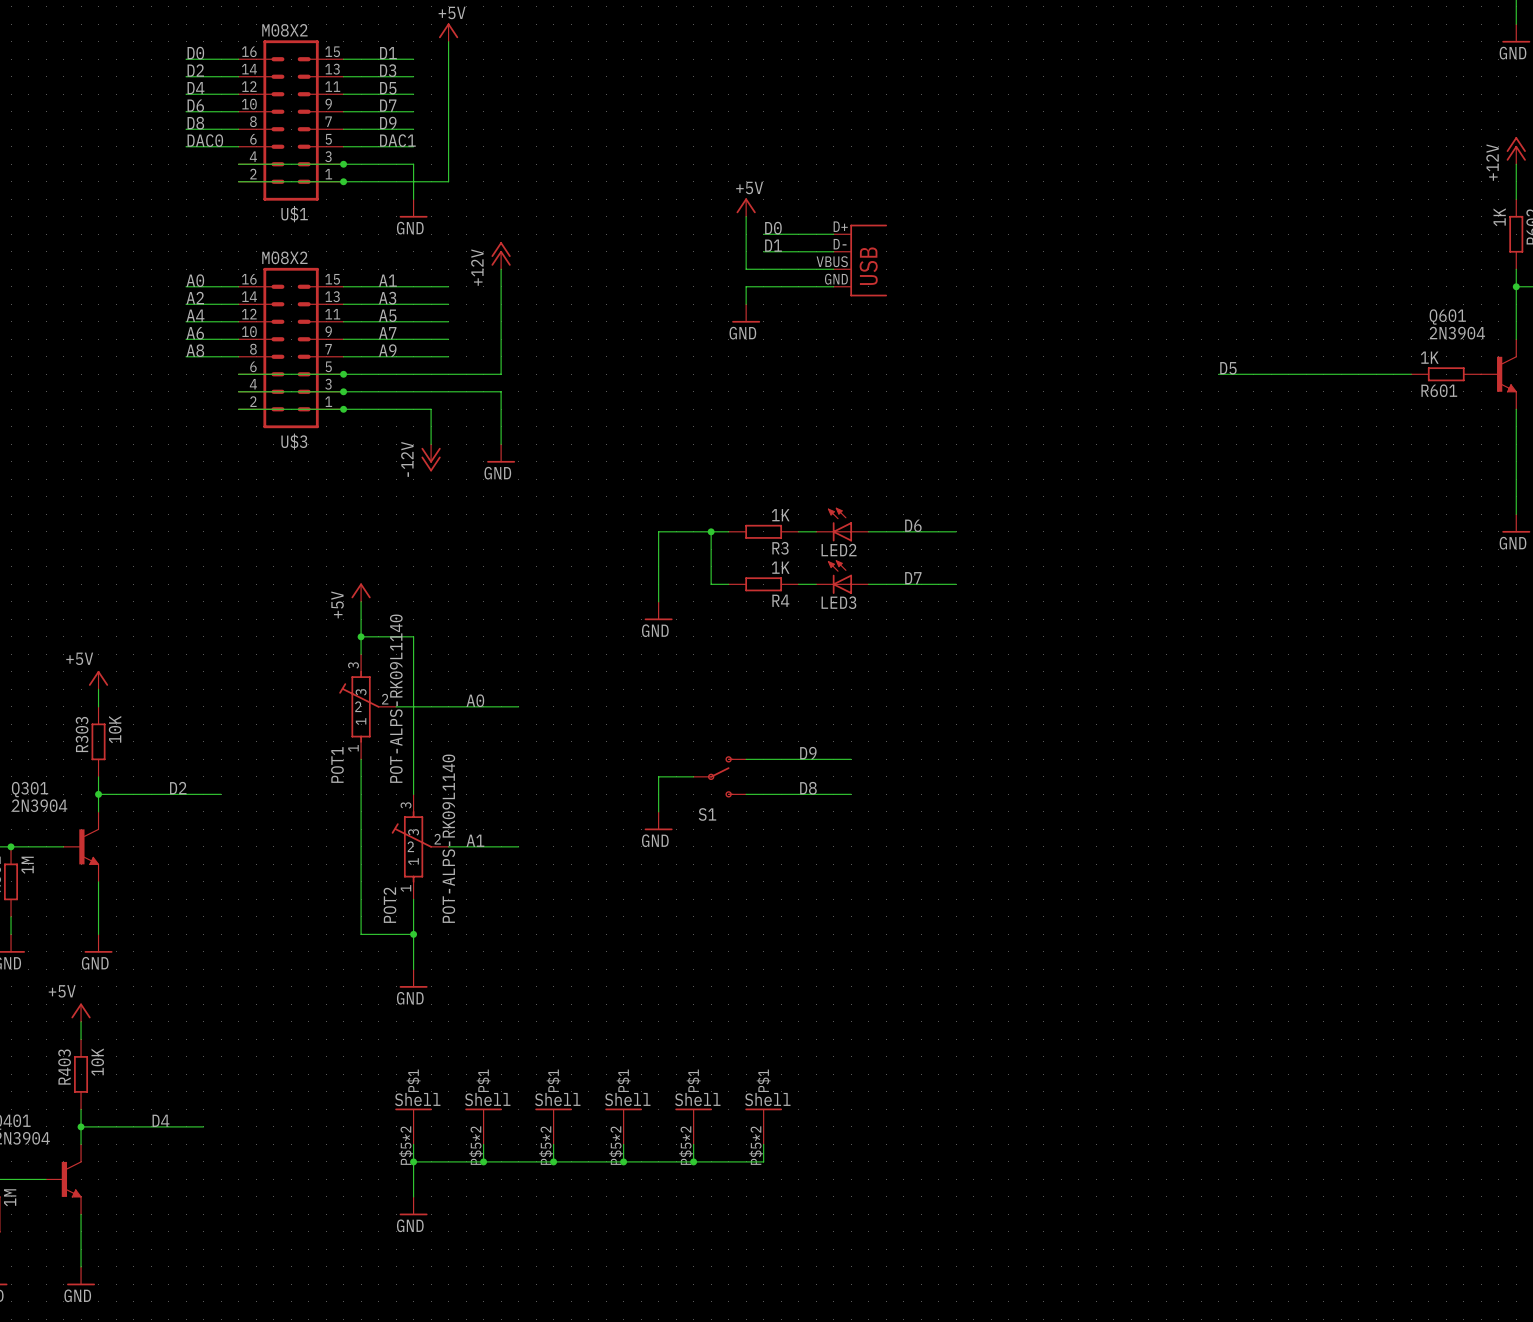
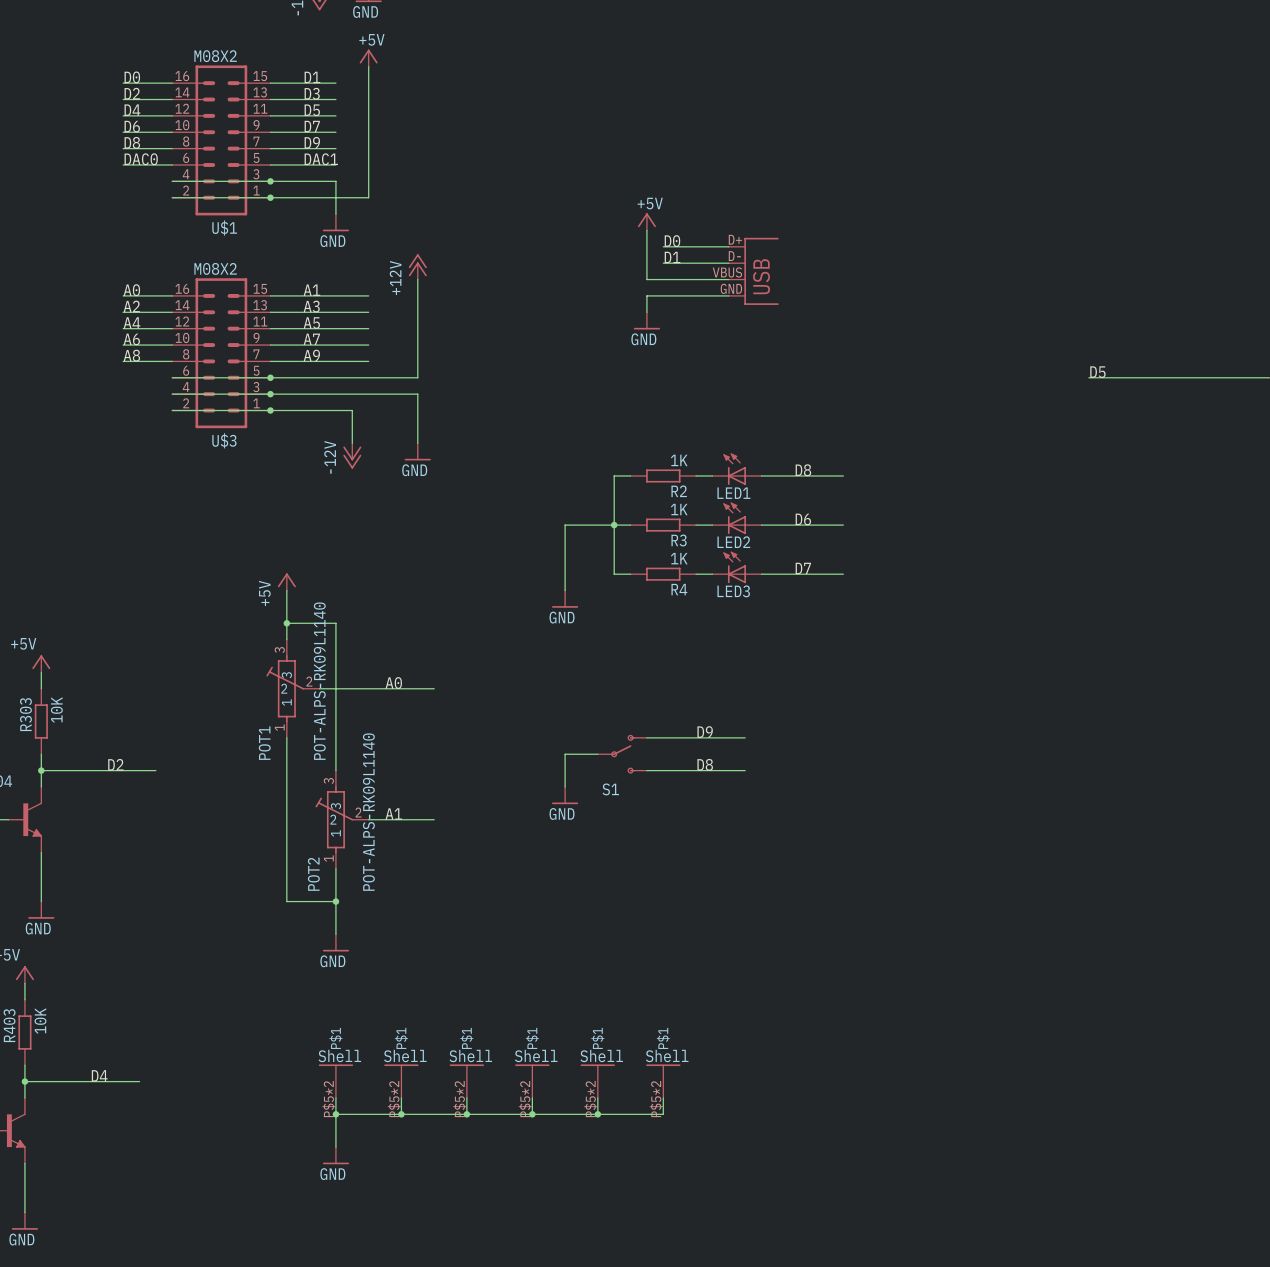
LED1: none -> (736, 469)
label: none -> D8 (803, 470)
wire: none -> (630, 475) (614, 475) (614, 525)
R2: none -> 1K (663, 475)
wire: none -> (696, 475) (712, 475)
wire: none -> (761, 475) (843, 475)

